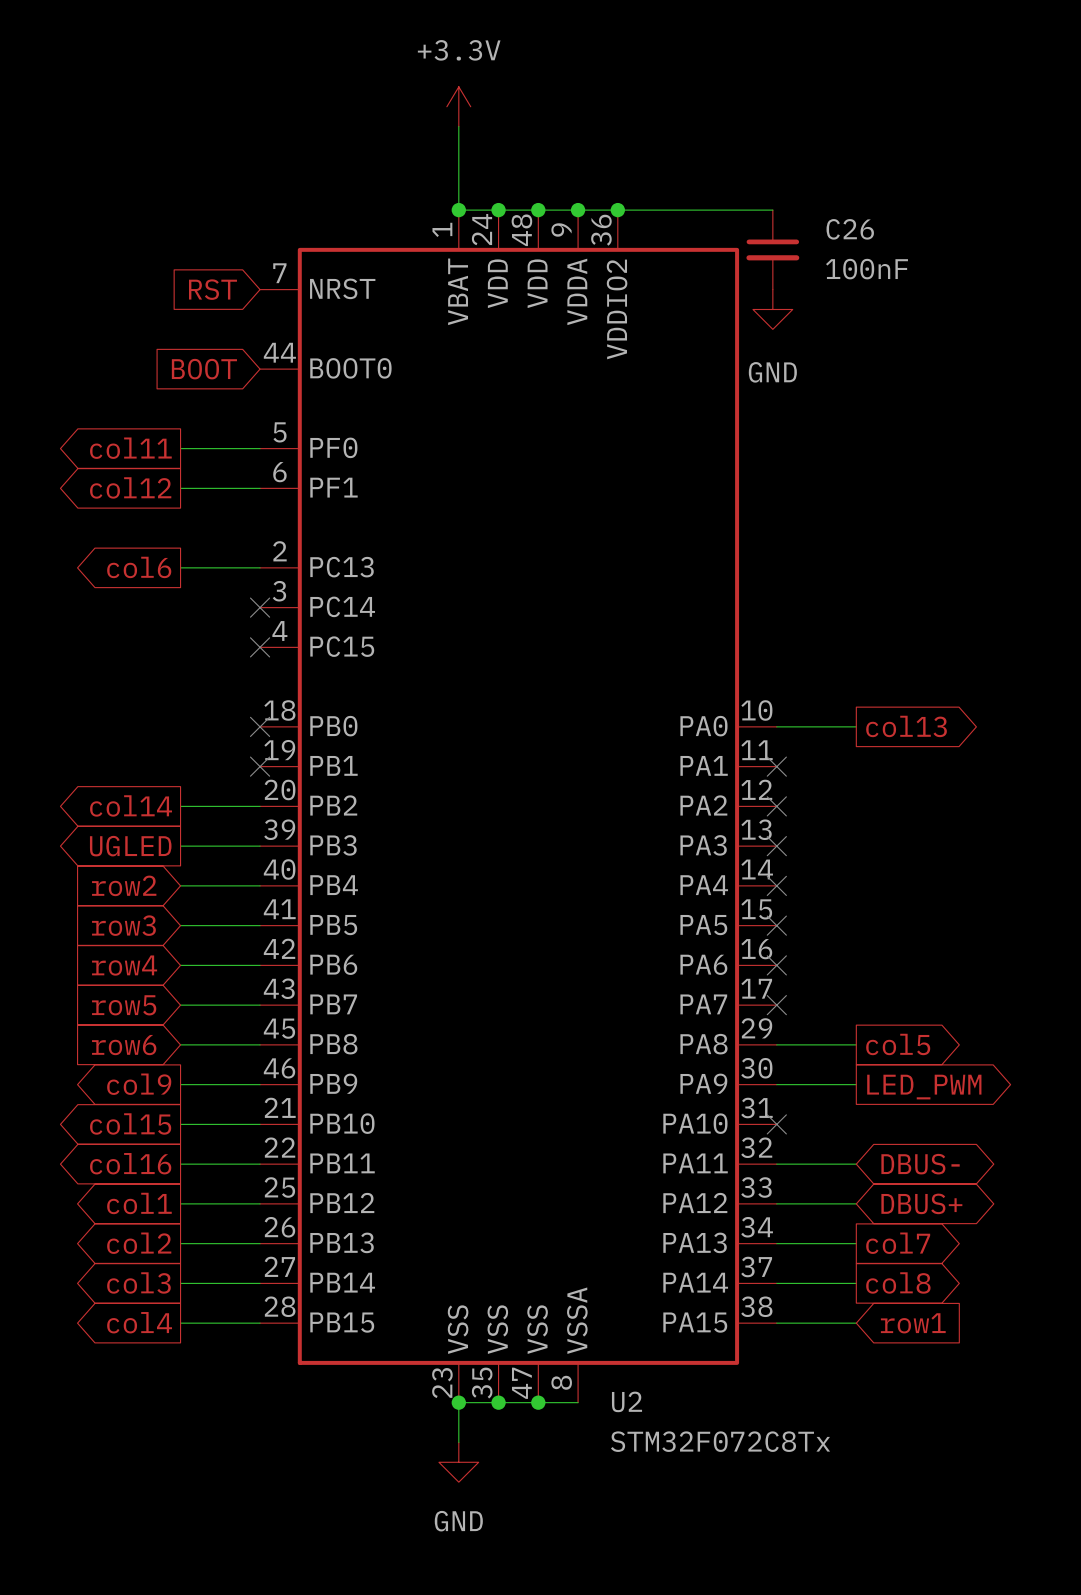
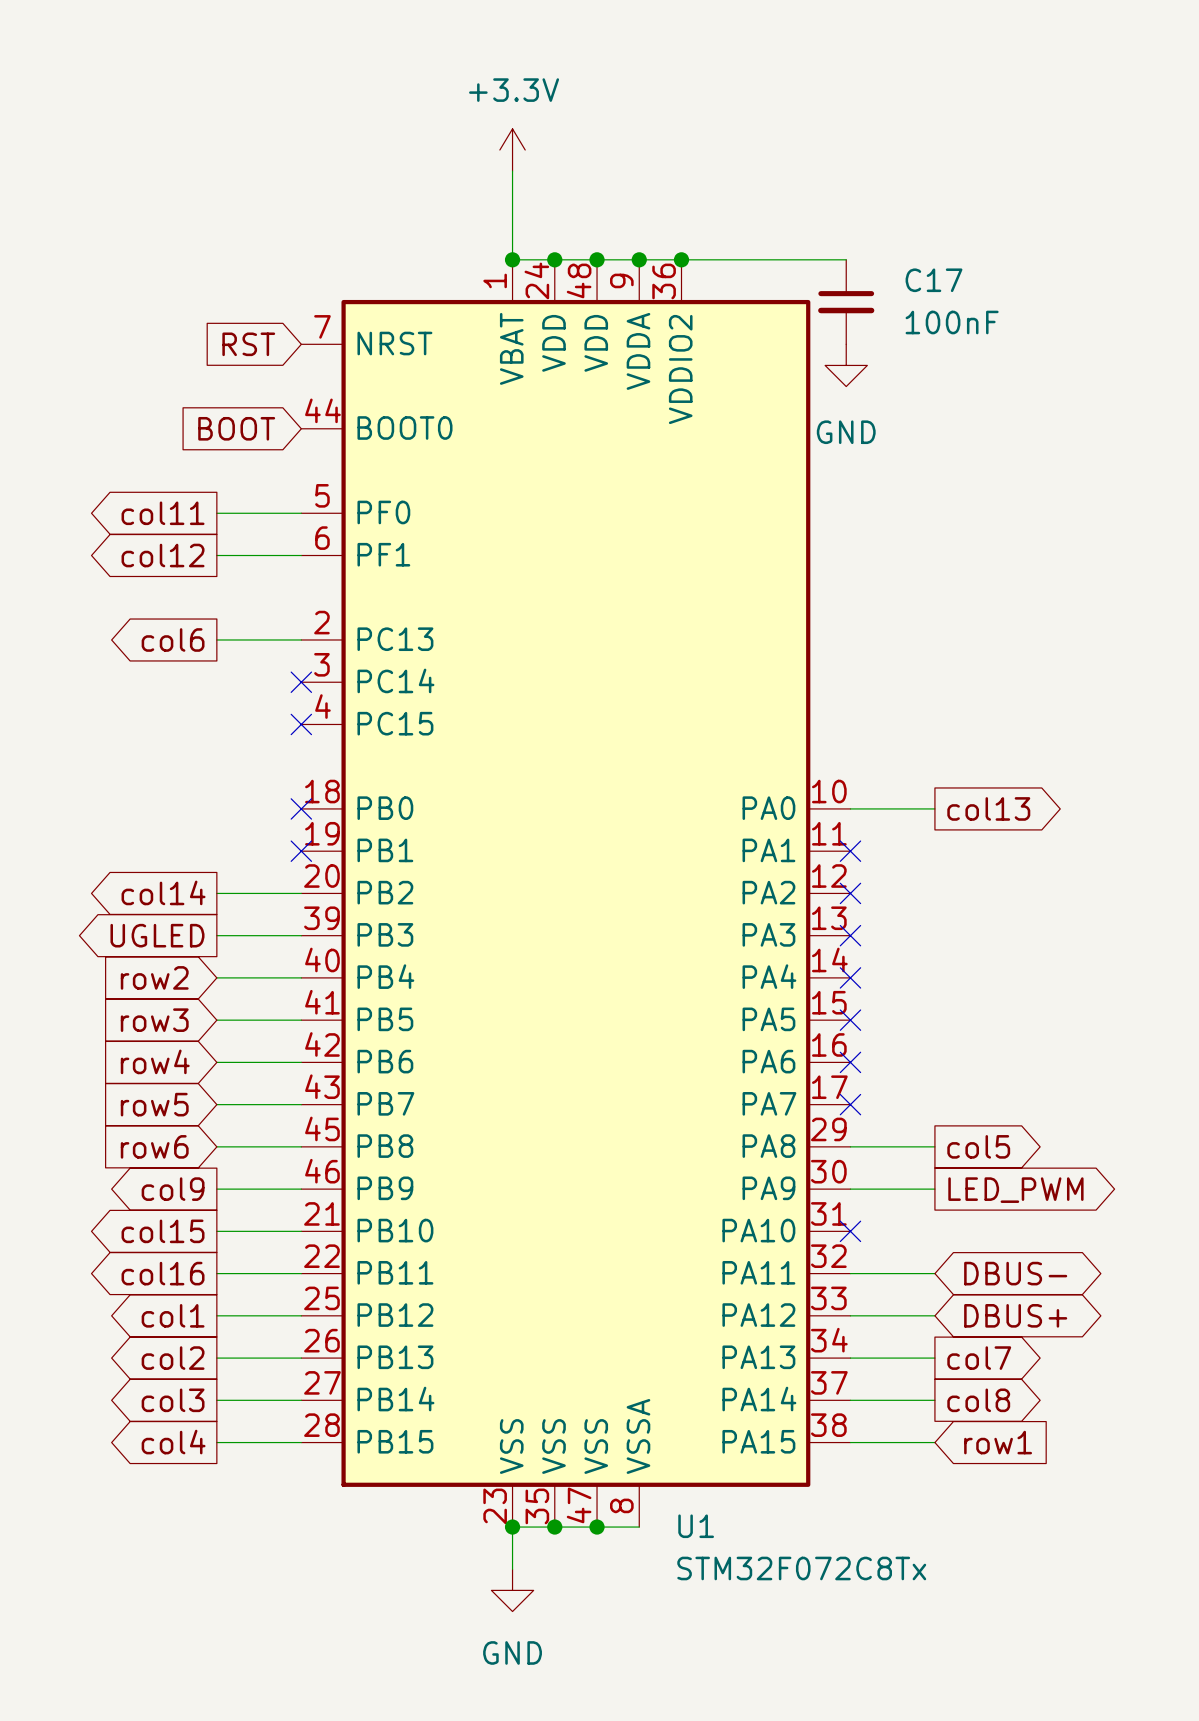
C26 name: C26 (850, 229) -> C17 (933, 280)
U2 name: U2 (627, 1401) -> U1 (696, 1526)

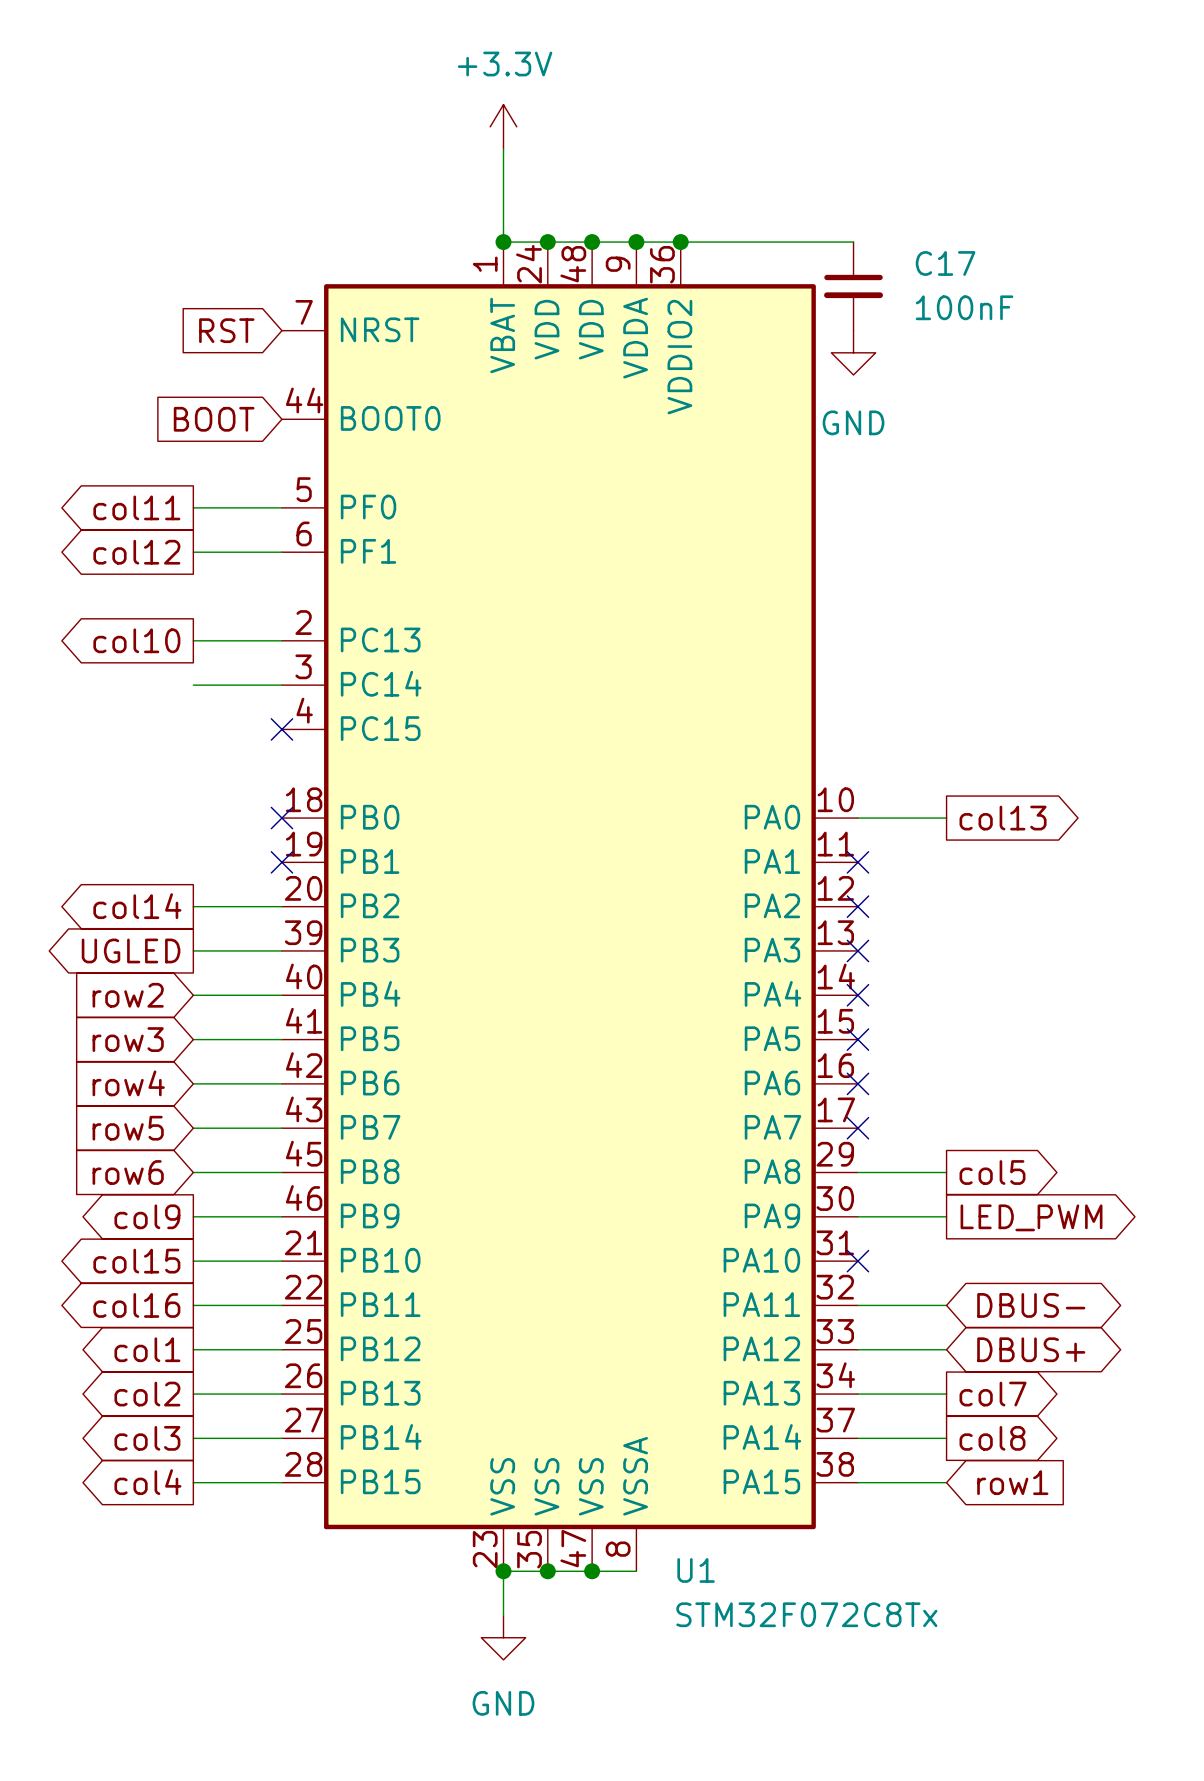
global label: col6 (173, 639) -> col10 (136, 640)
wire: none -> (193, 685) (281, 685)
no-connect mark: (301, 682) -> none

